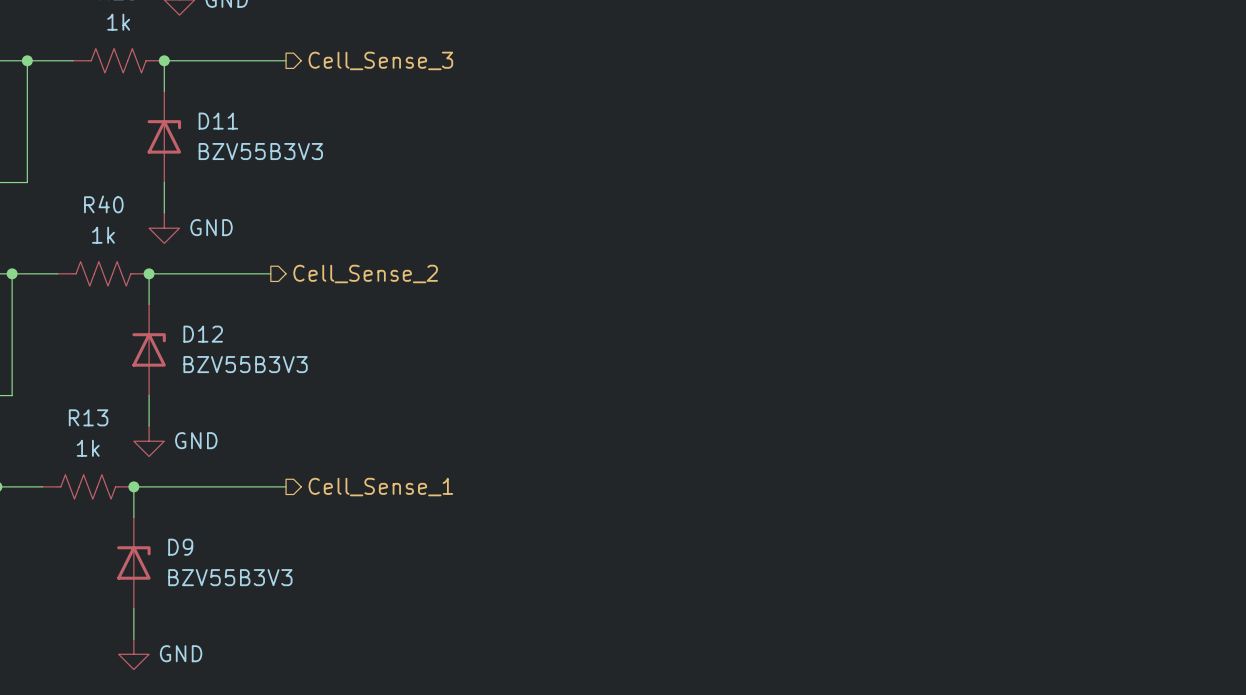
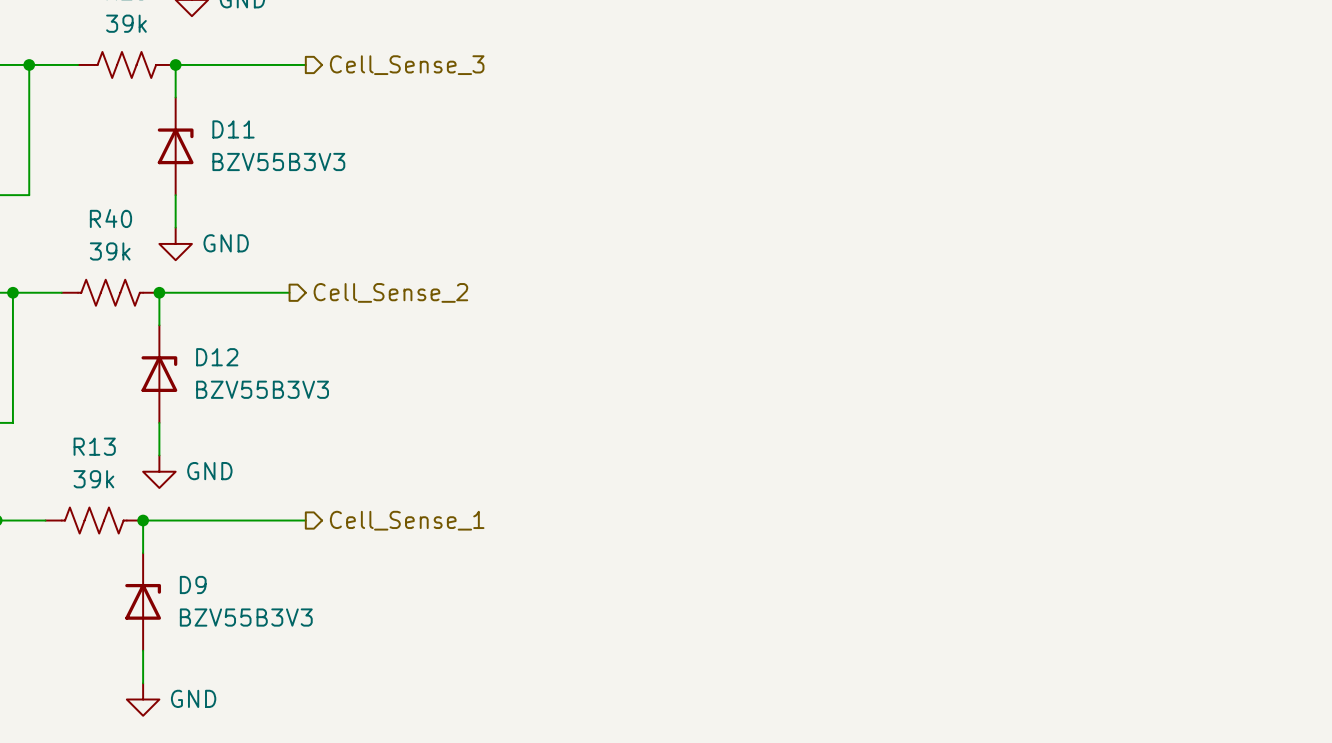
part value: 1k (118, 22) -> 39k (126, 23)
R40 value: 1k (103, 235) -> 39k (110, 251)
R13 value: 1k (88, 448) -> 39k (93, 479)

